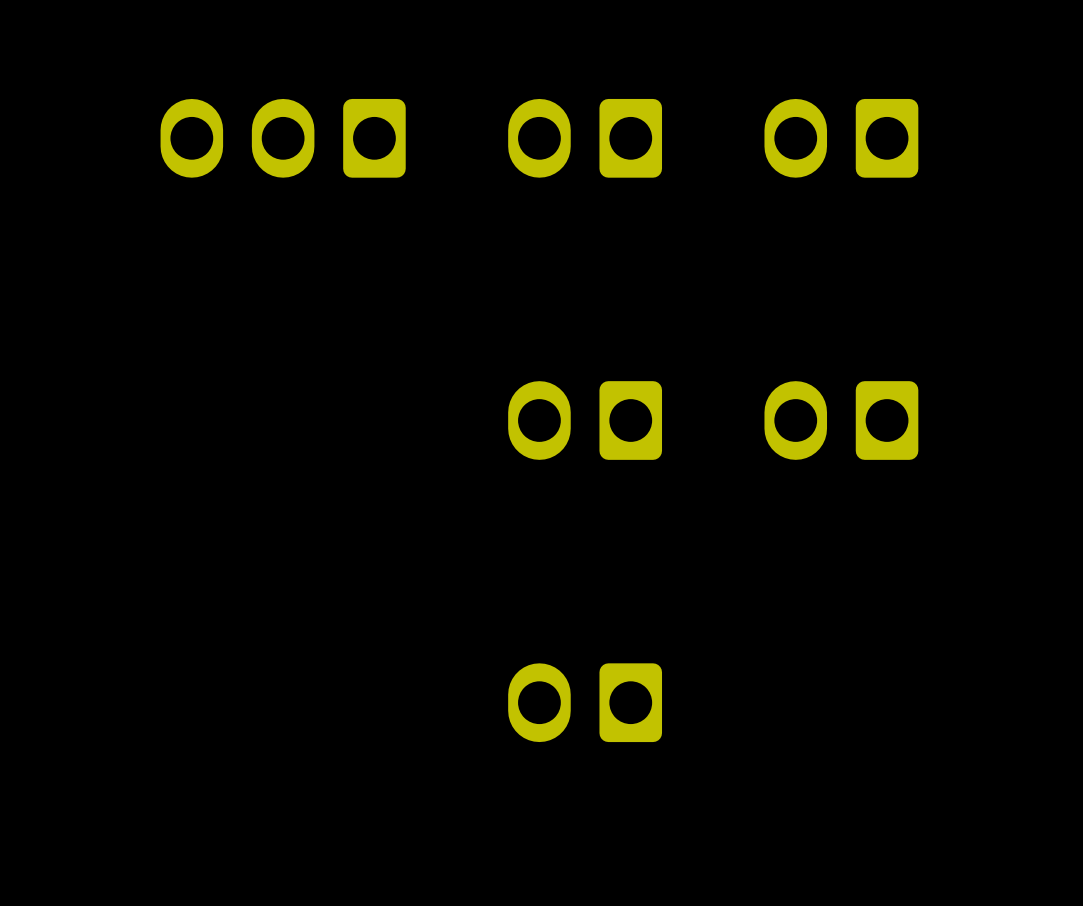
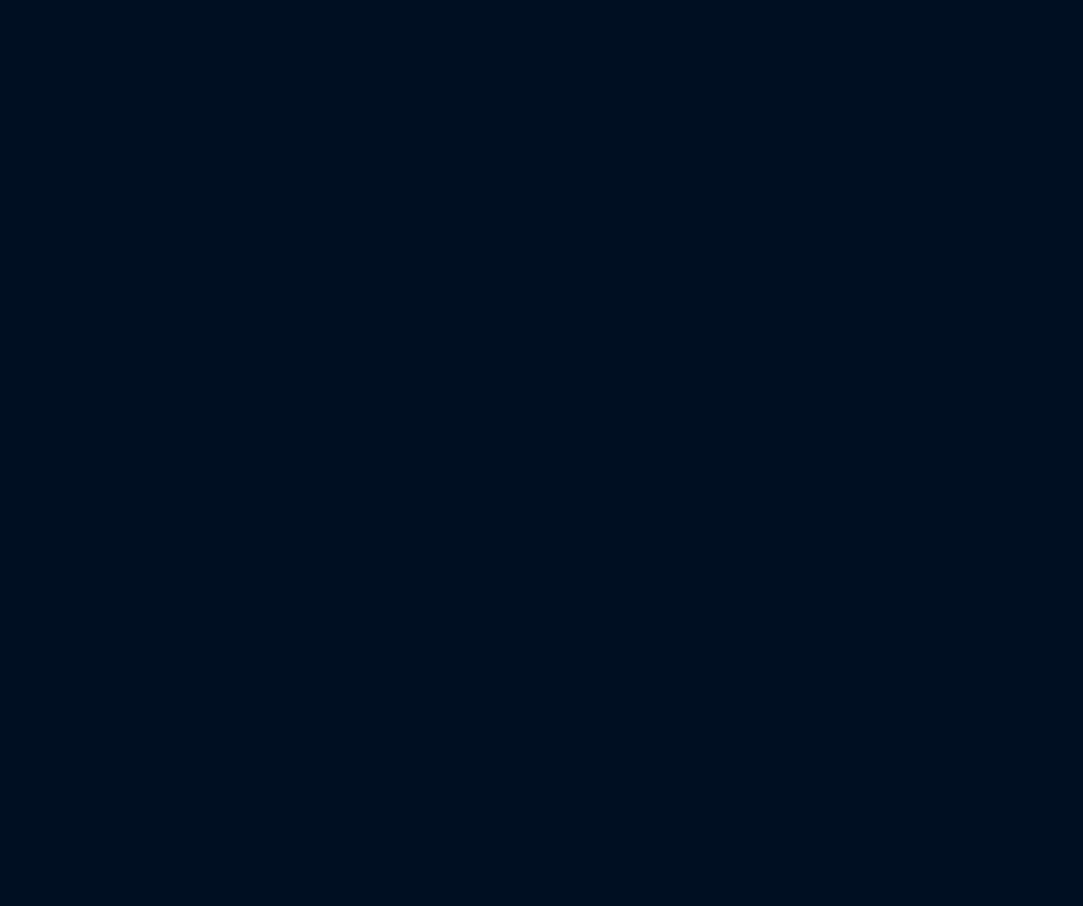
part: (283, 138) -> none
part: (585, 138) -> none
part: (841, 138) -> none
part: (585, 420) -> none
part: (841, 420) -> none
part: (585, 702) -> none

